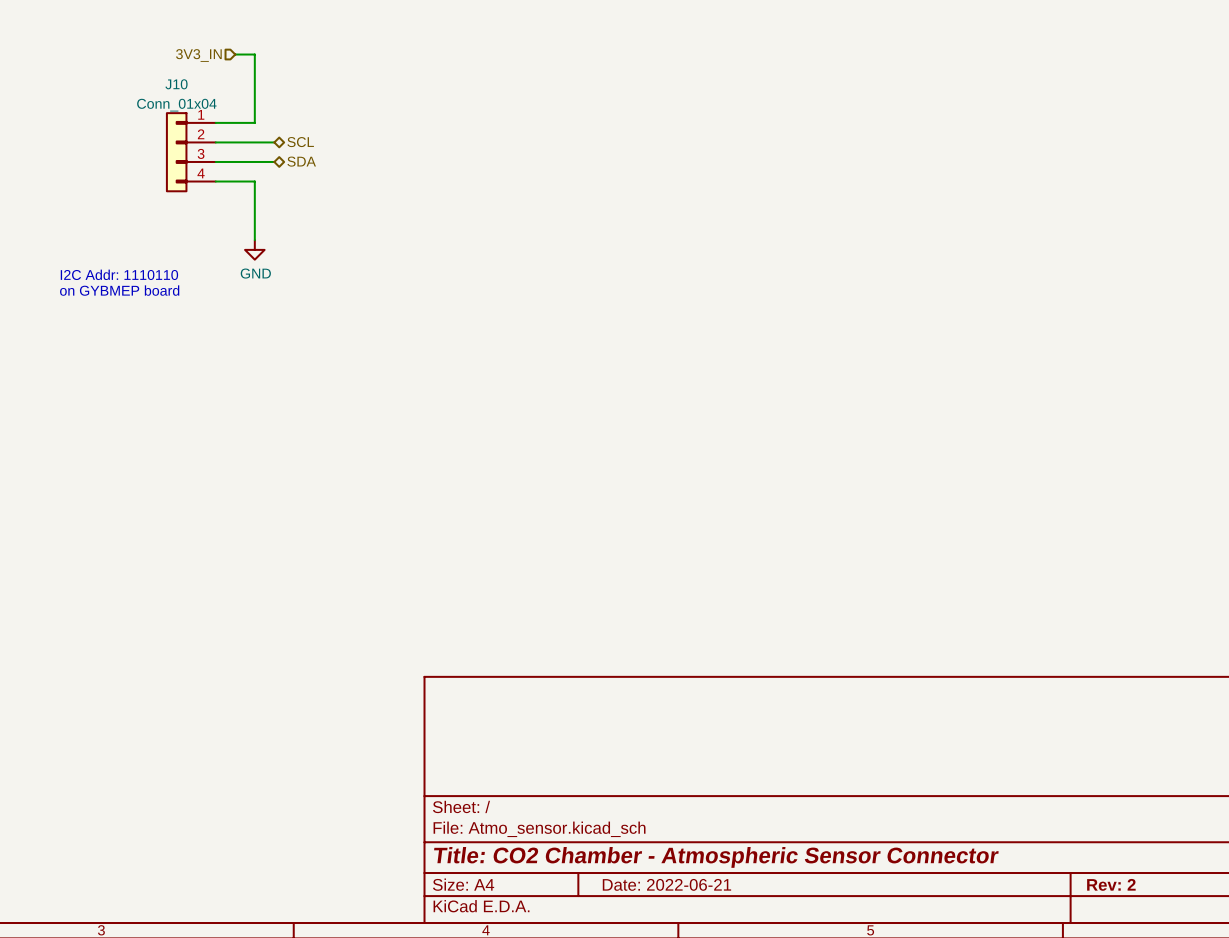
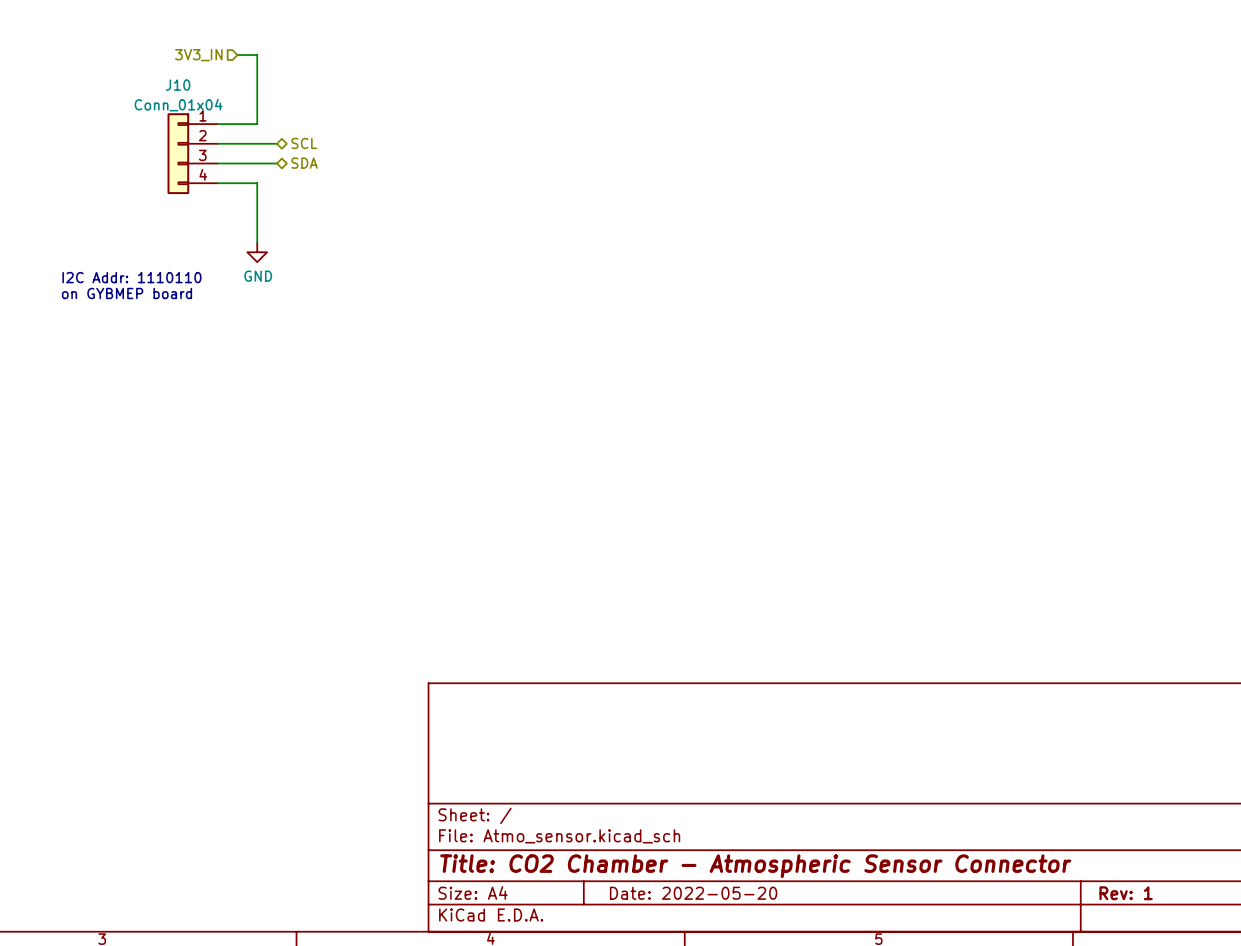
title block: Date: 2022-06-21 (666, 884) -> Date: 2022-05-20 (693, 893)
title block: Rev: 2 (1111, 884) -> Rev: 1 (1126, 893)

